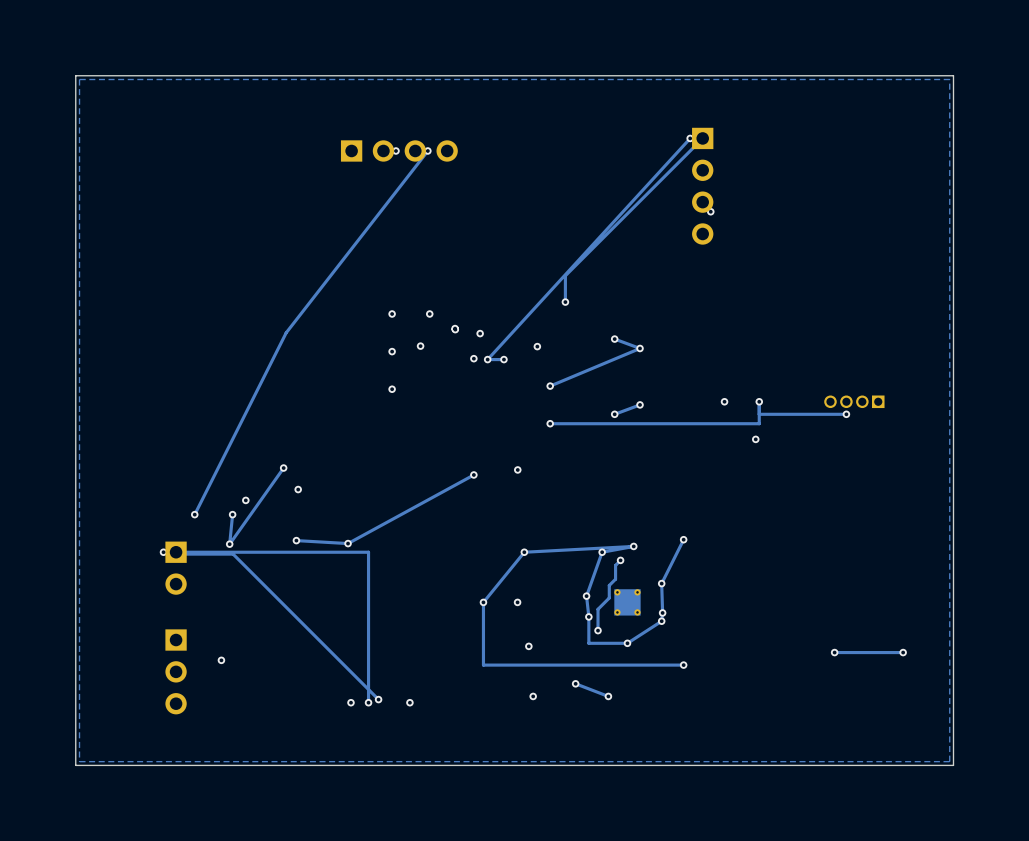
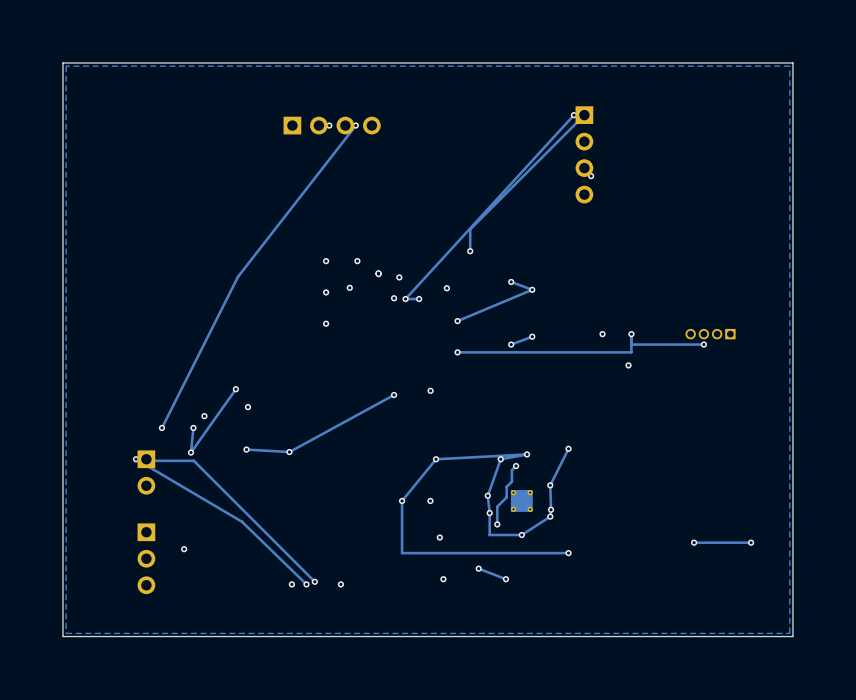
track: (163, 552) (368, 552) (368, 702) -> (135, 459) (242, 521) (306, 584)

